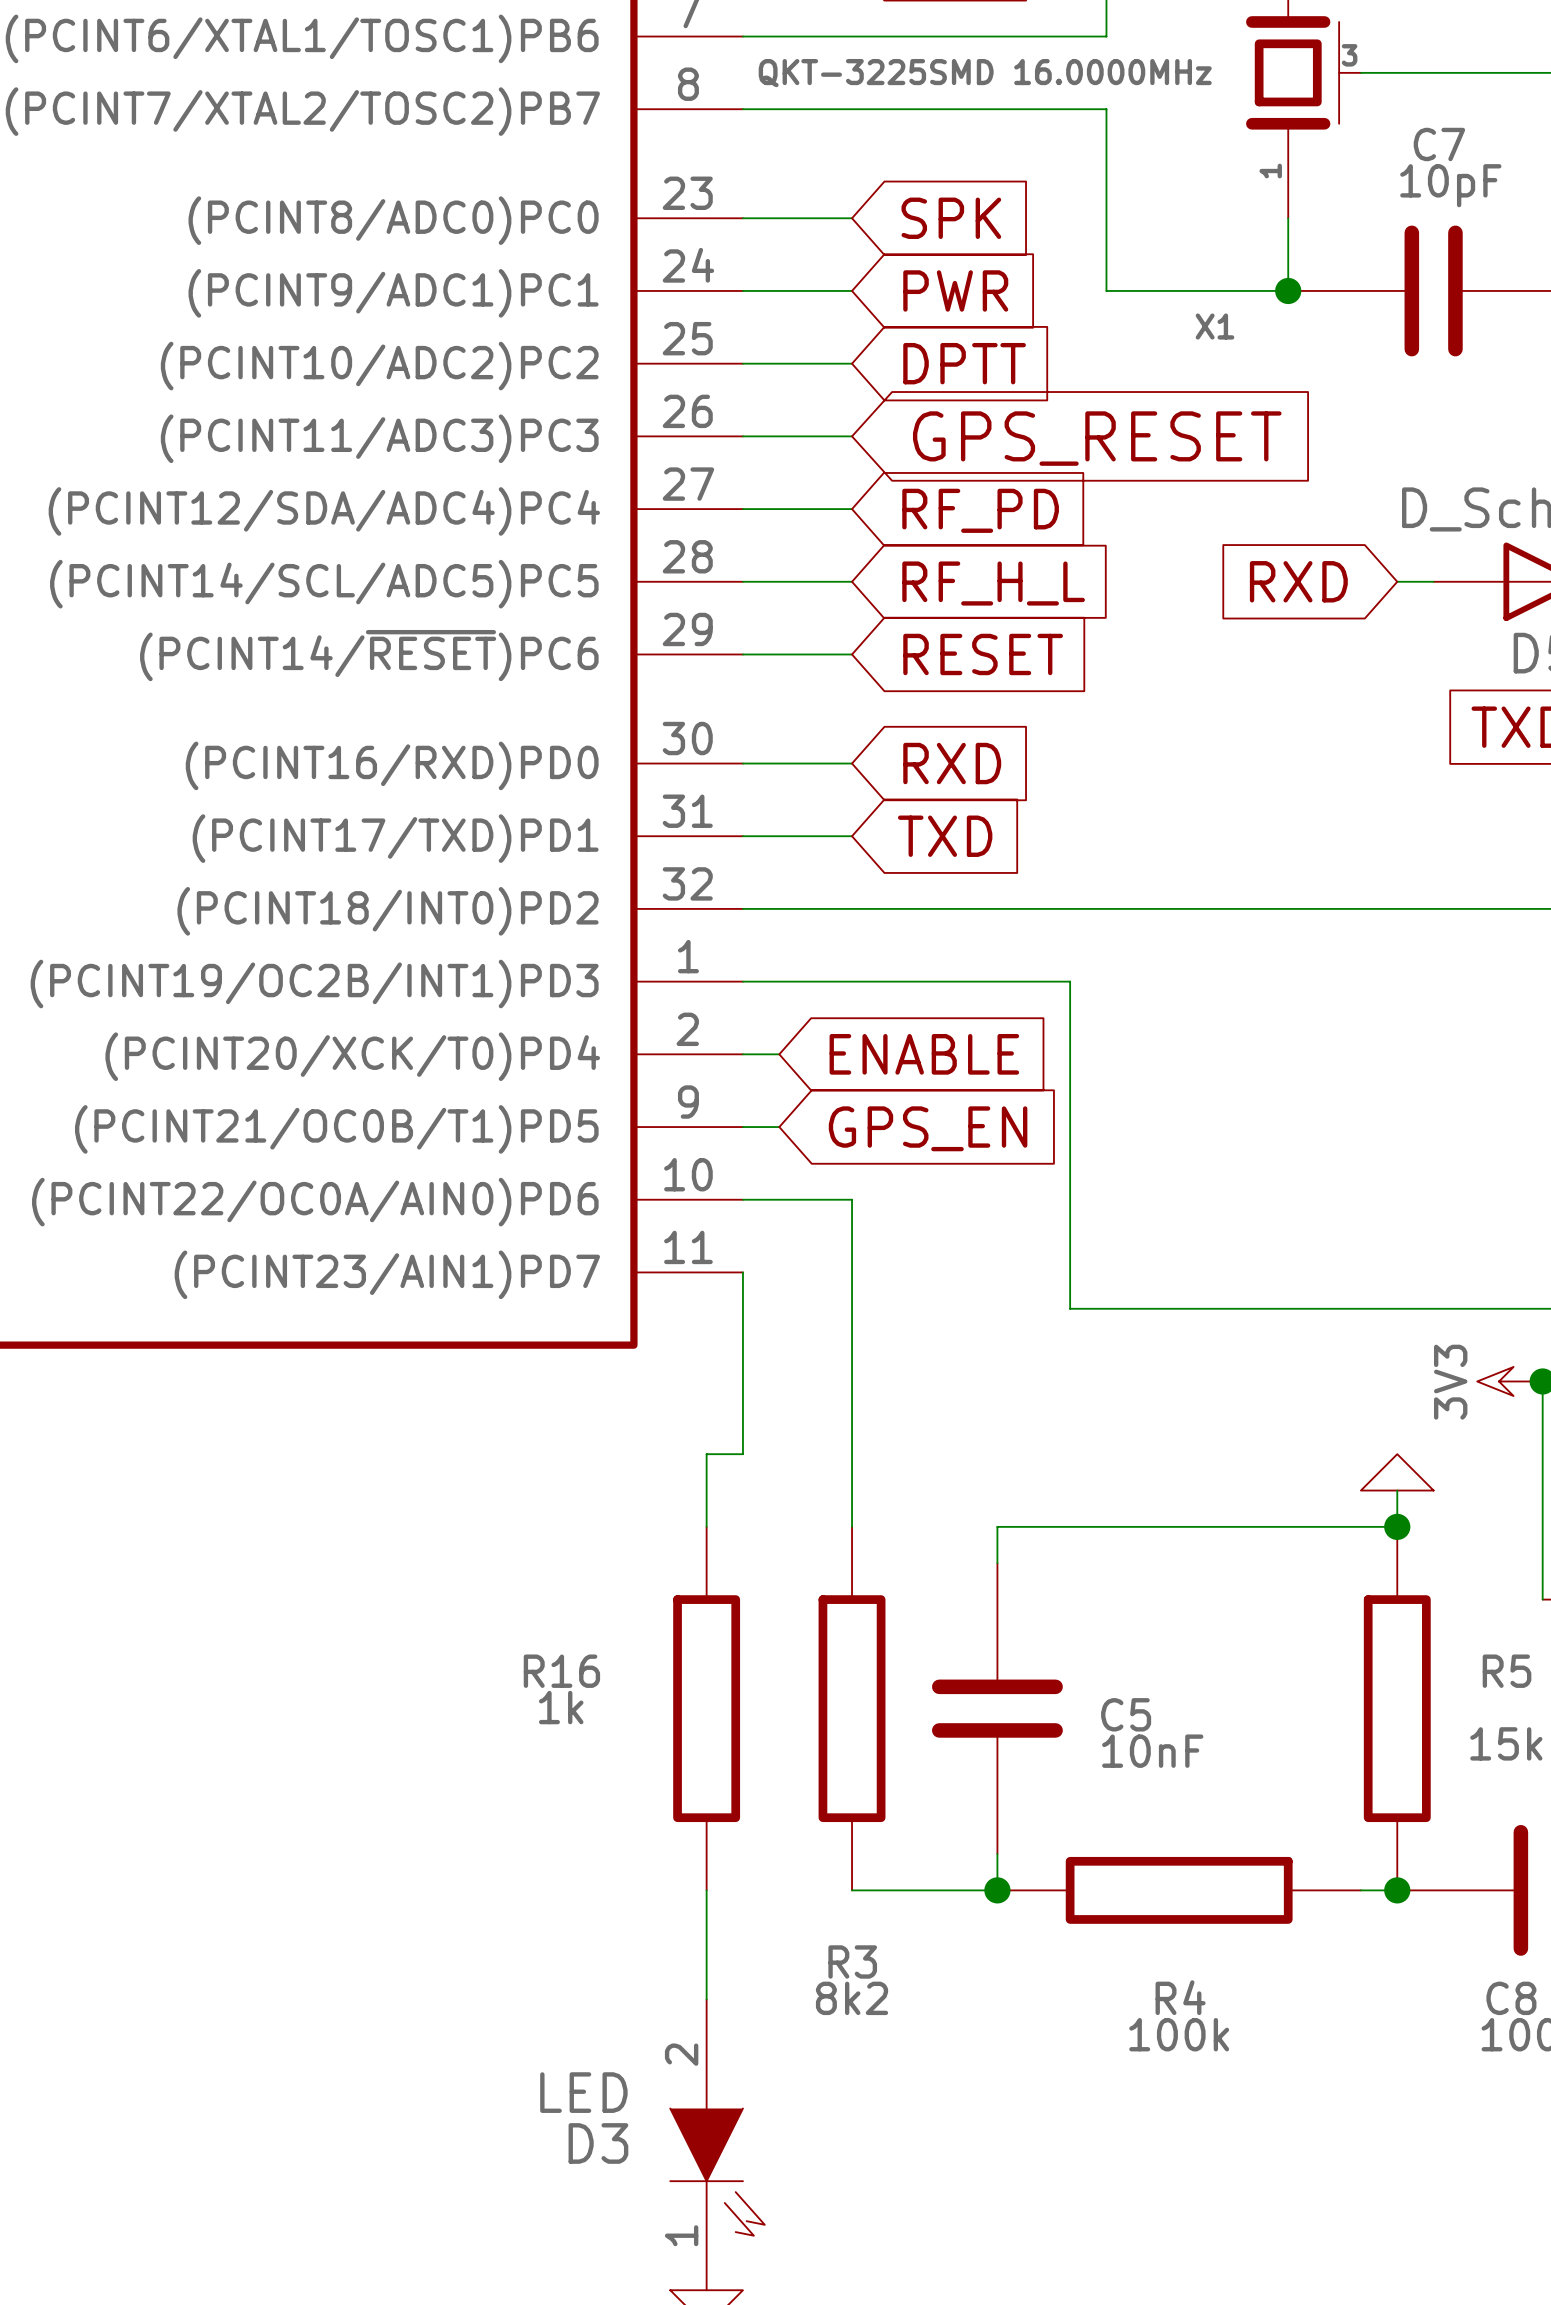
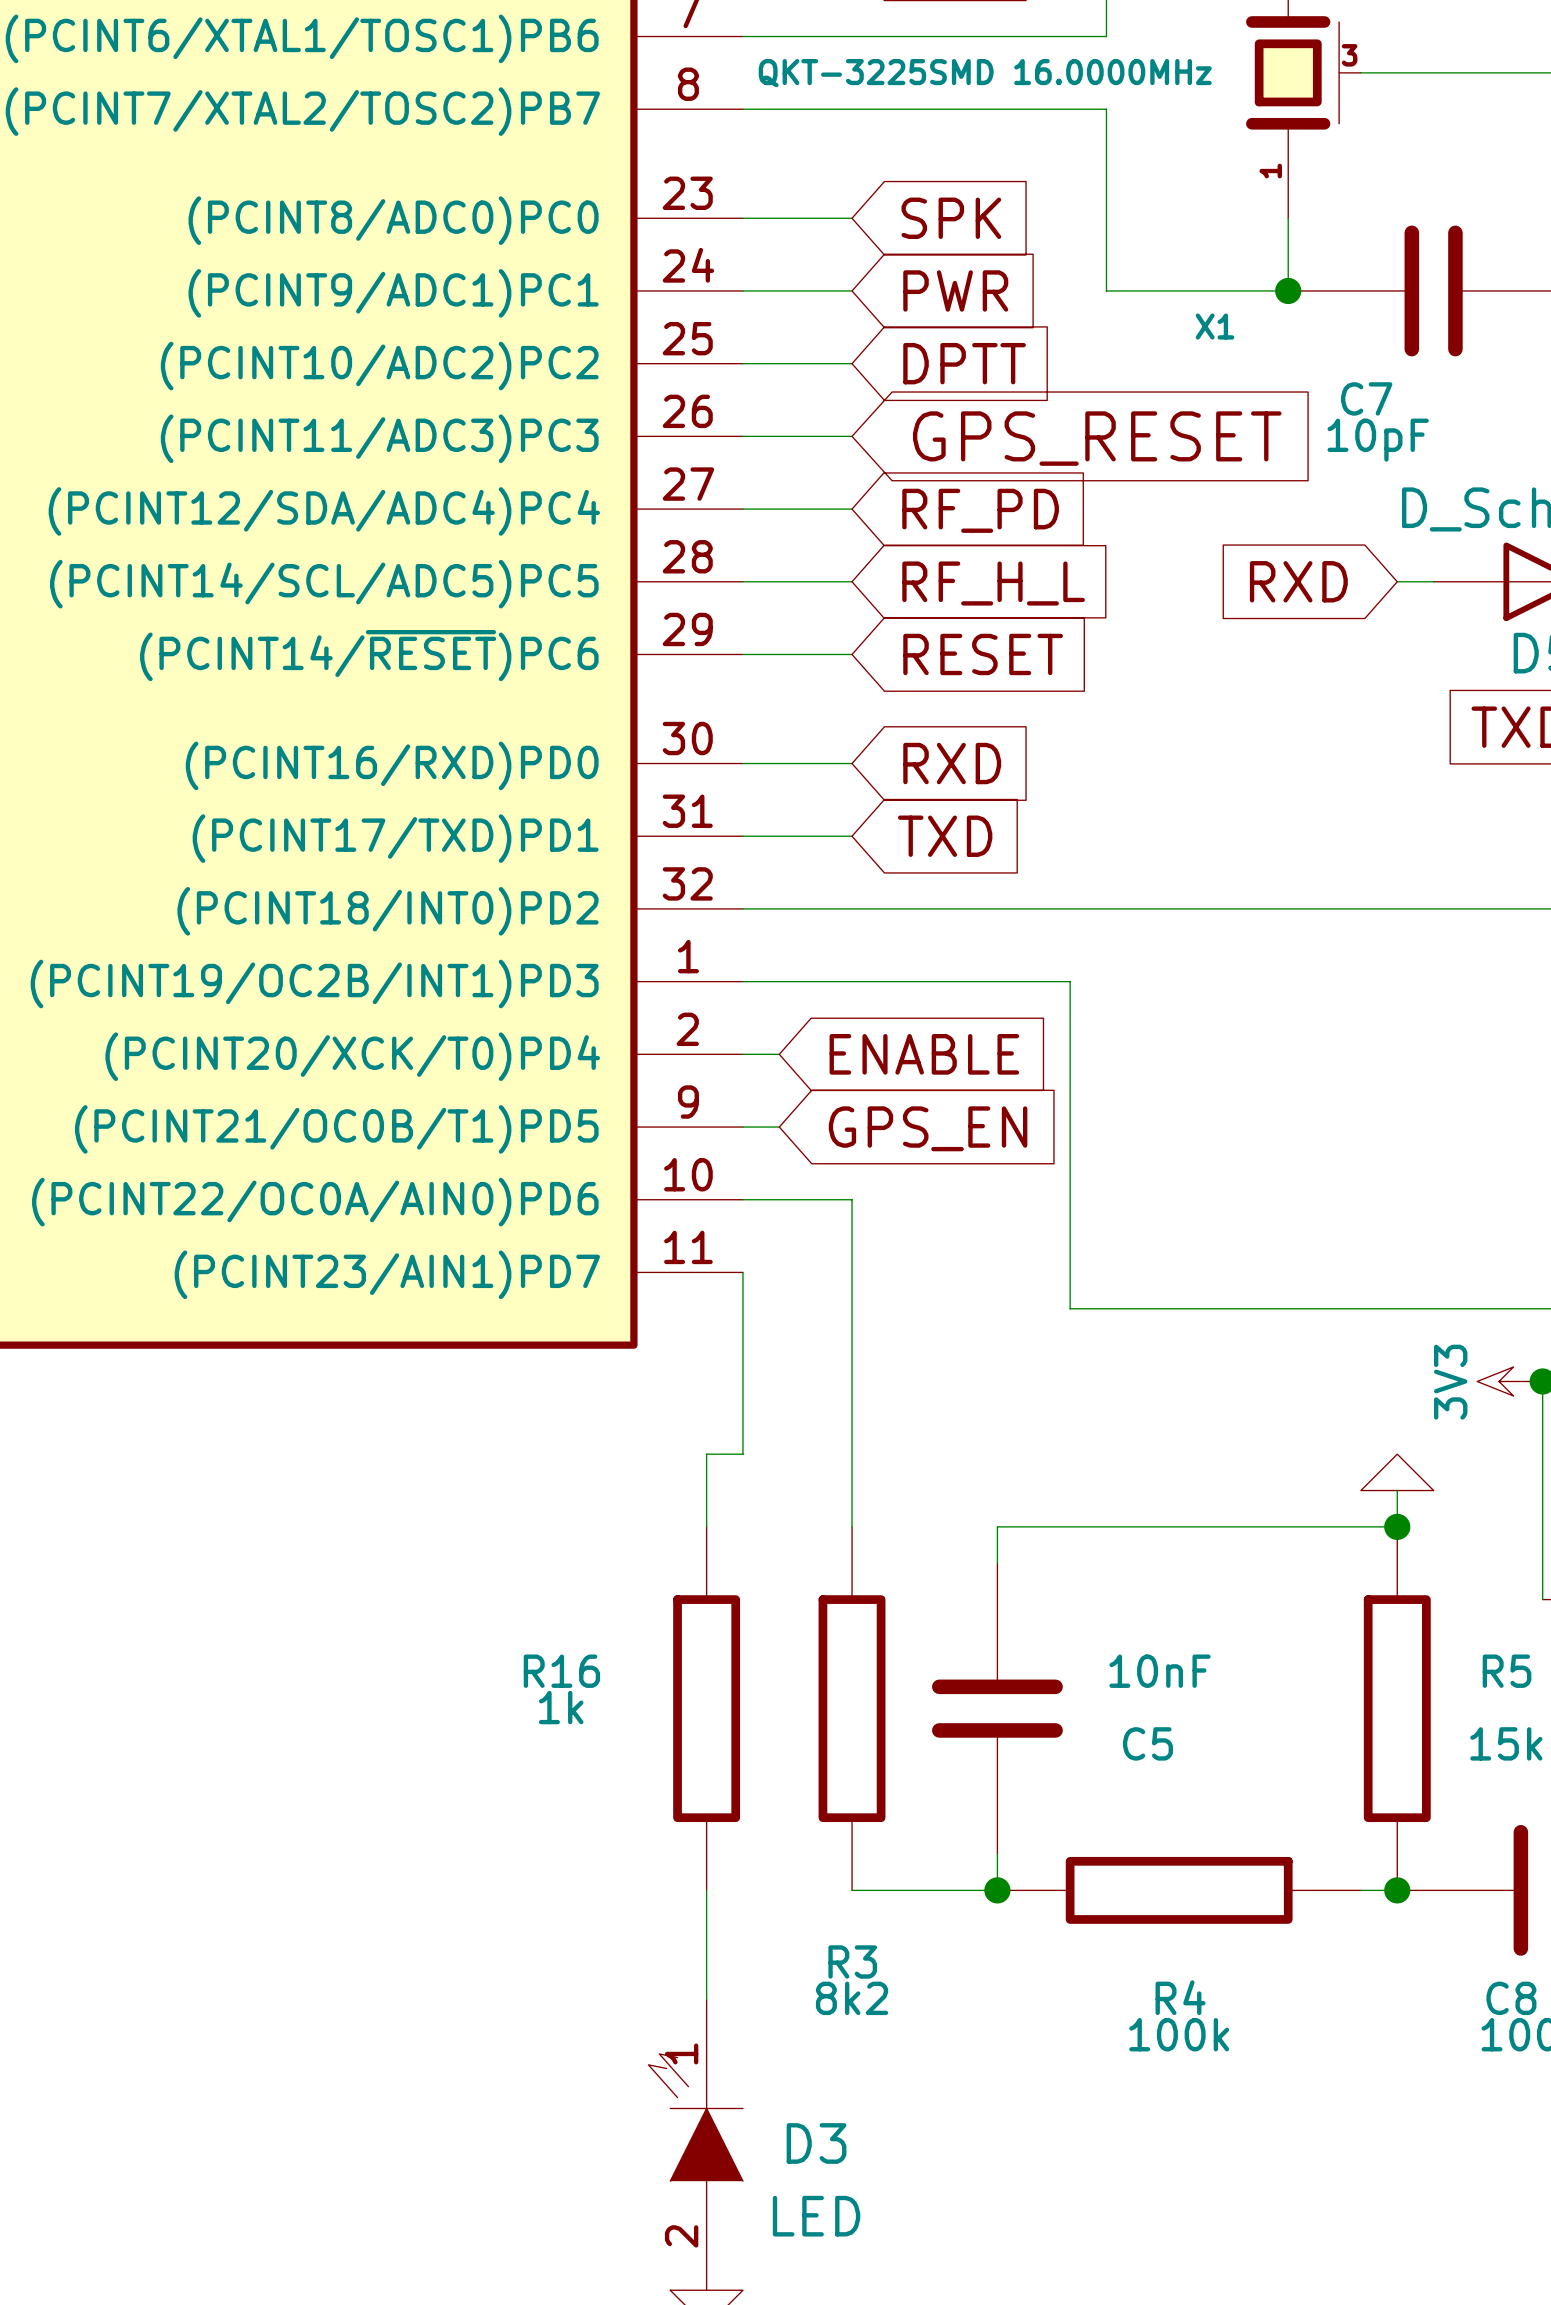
C7 name position: C7 (1439, 144) -> C7 (1366, 398)
C7 value position: 10pF (1450, 185) -> 10pF (1378, 440)
C5 name position: C5 (1126, 1714) -> C5 (1147, 1743)
C5 value position: 10nF (1152, 1751) -> 10nF (1160, 1671)
D3 rotation: 0° (717, 2172) -> 180° (695, 2117)

